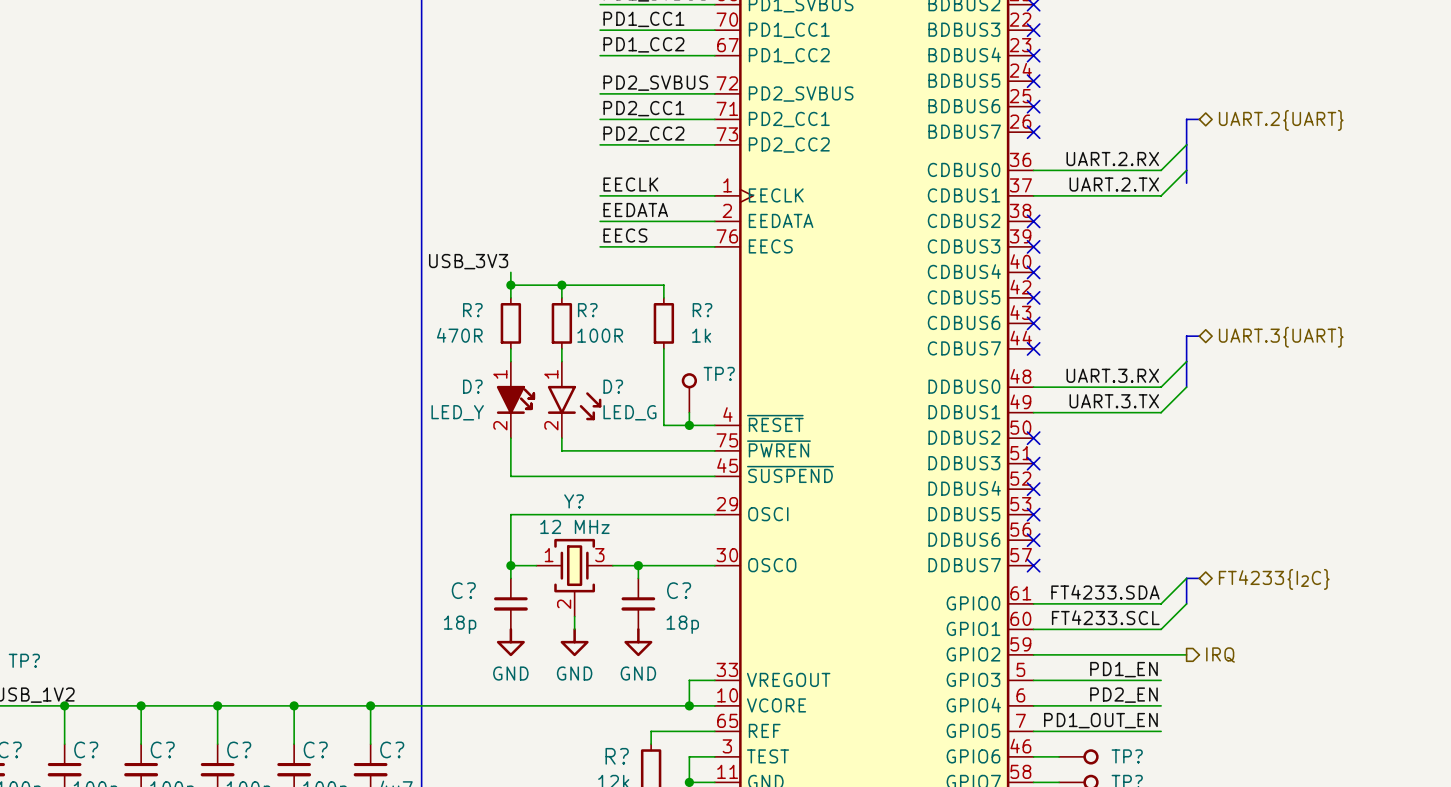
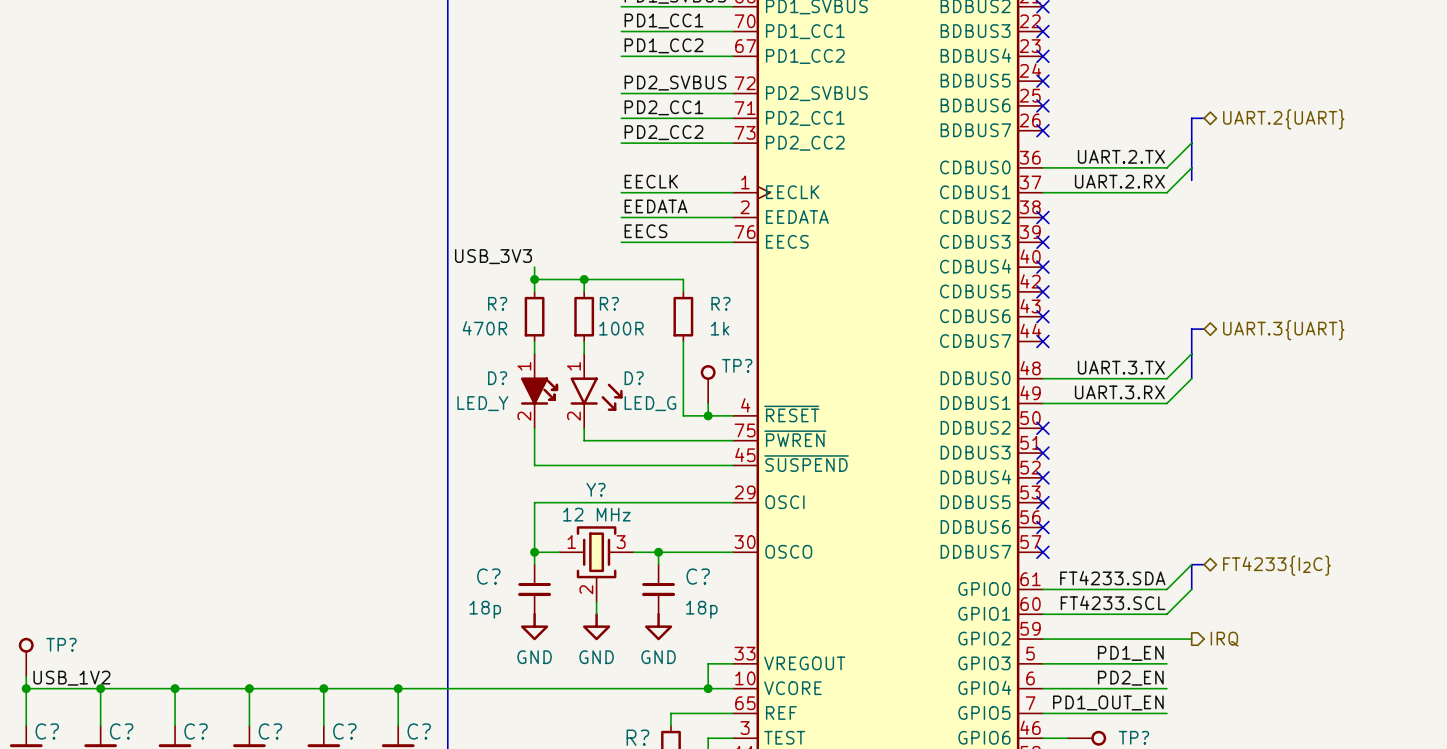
label: UART.2.RX (1112, 159) -> UART.2.TX (1121, 156)
label: UART.2.TX (1114, 184) -> UART.2.RX (1119, 181)
label: UART.3.RX (1112, 375) -> UART.3.TX (1121, 367)
label: UART.3.TX (1114, 401) -> UART.3.RX (1119, 392)

